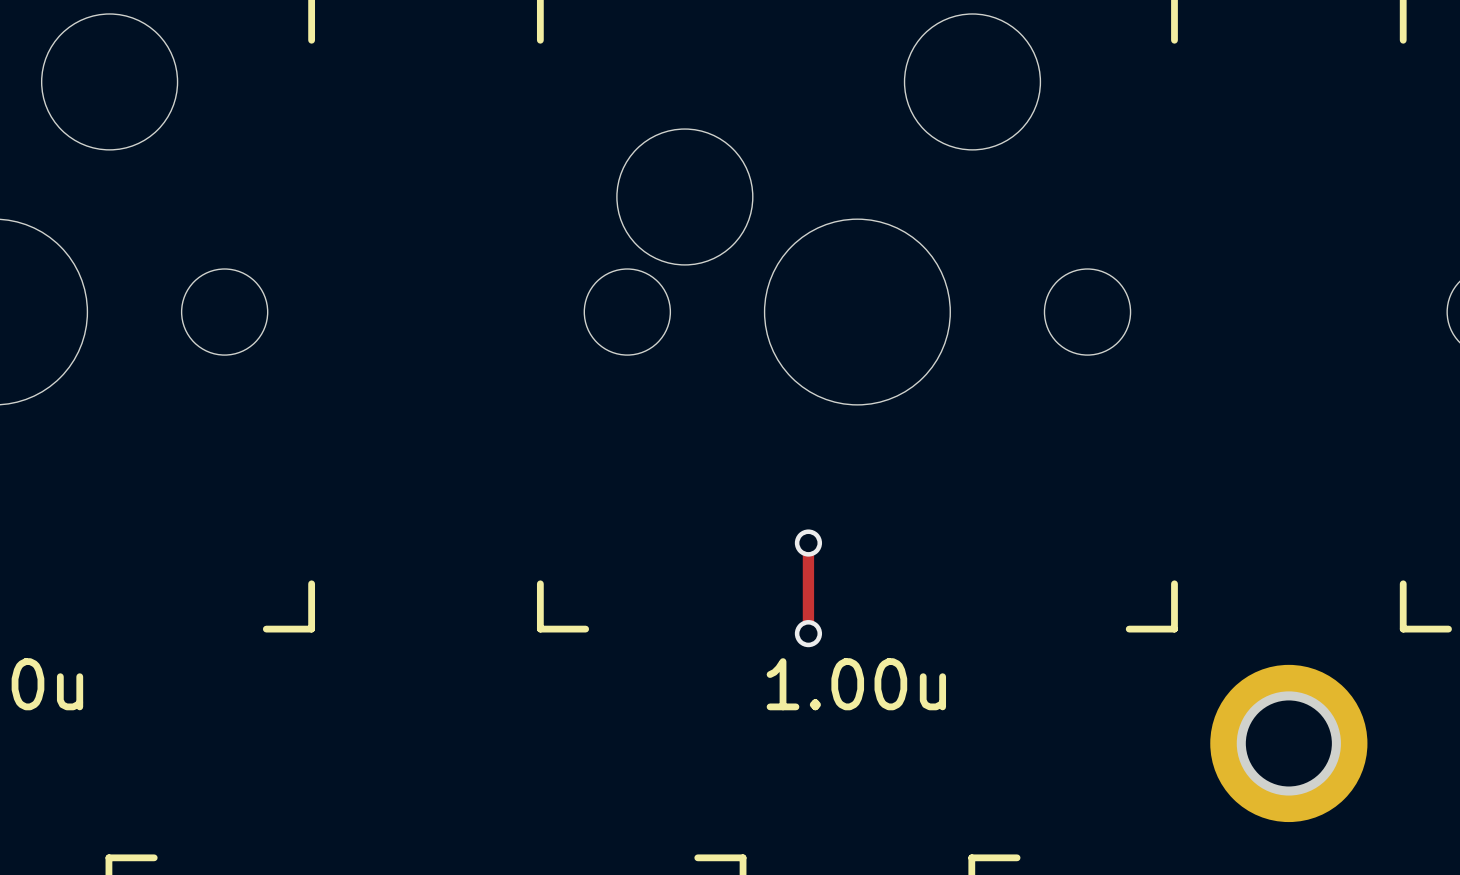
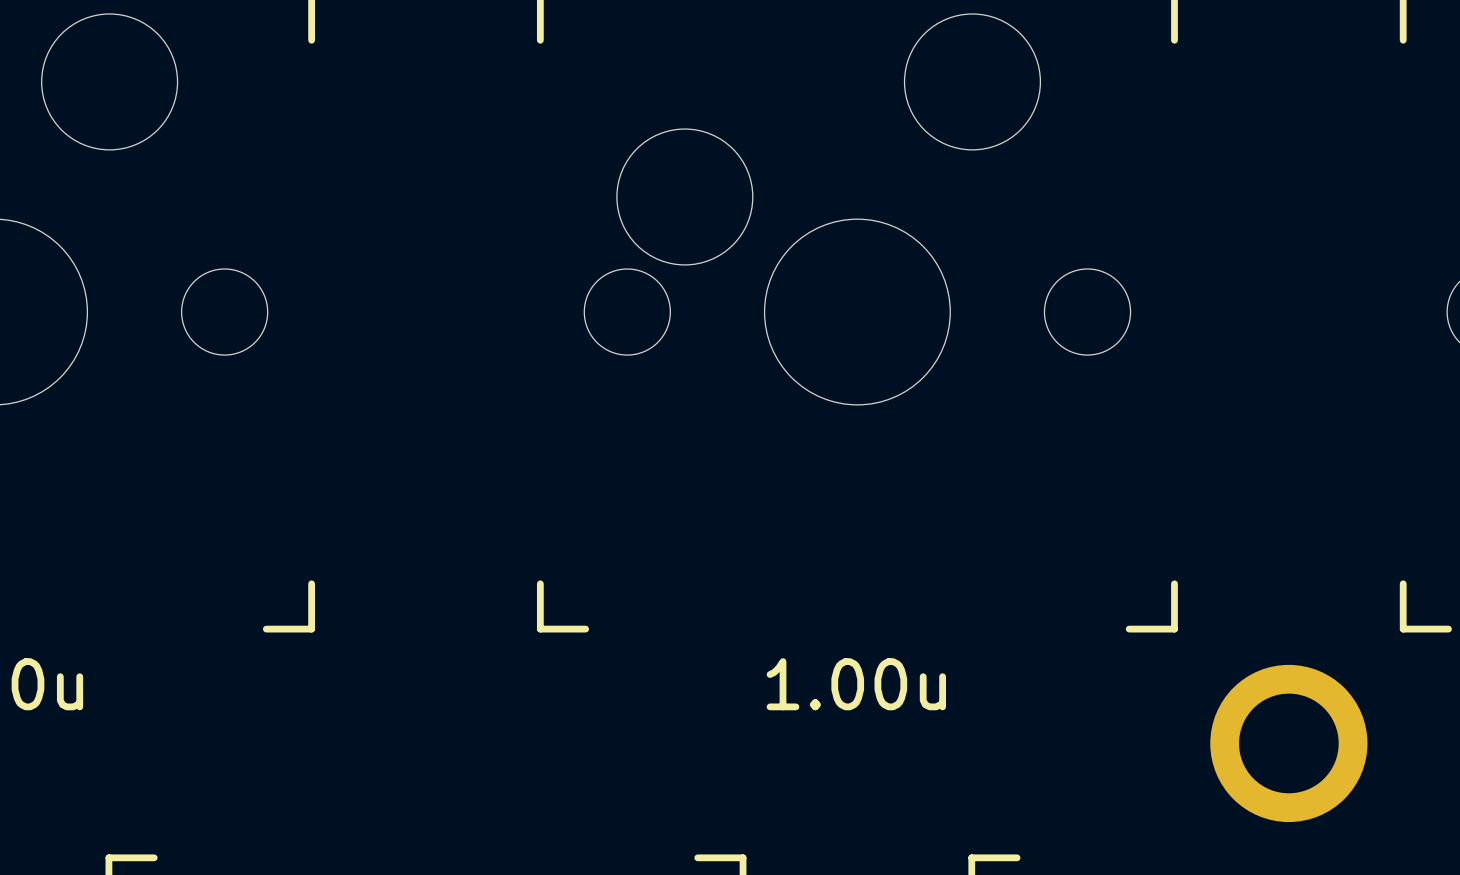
track: (808, 543) (808, 633) -> none
via: (808, 543) -> none
via: (808, 633) -> none
round board edge: [1236, 691, 1341, 796] -> none

